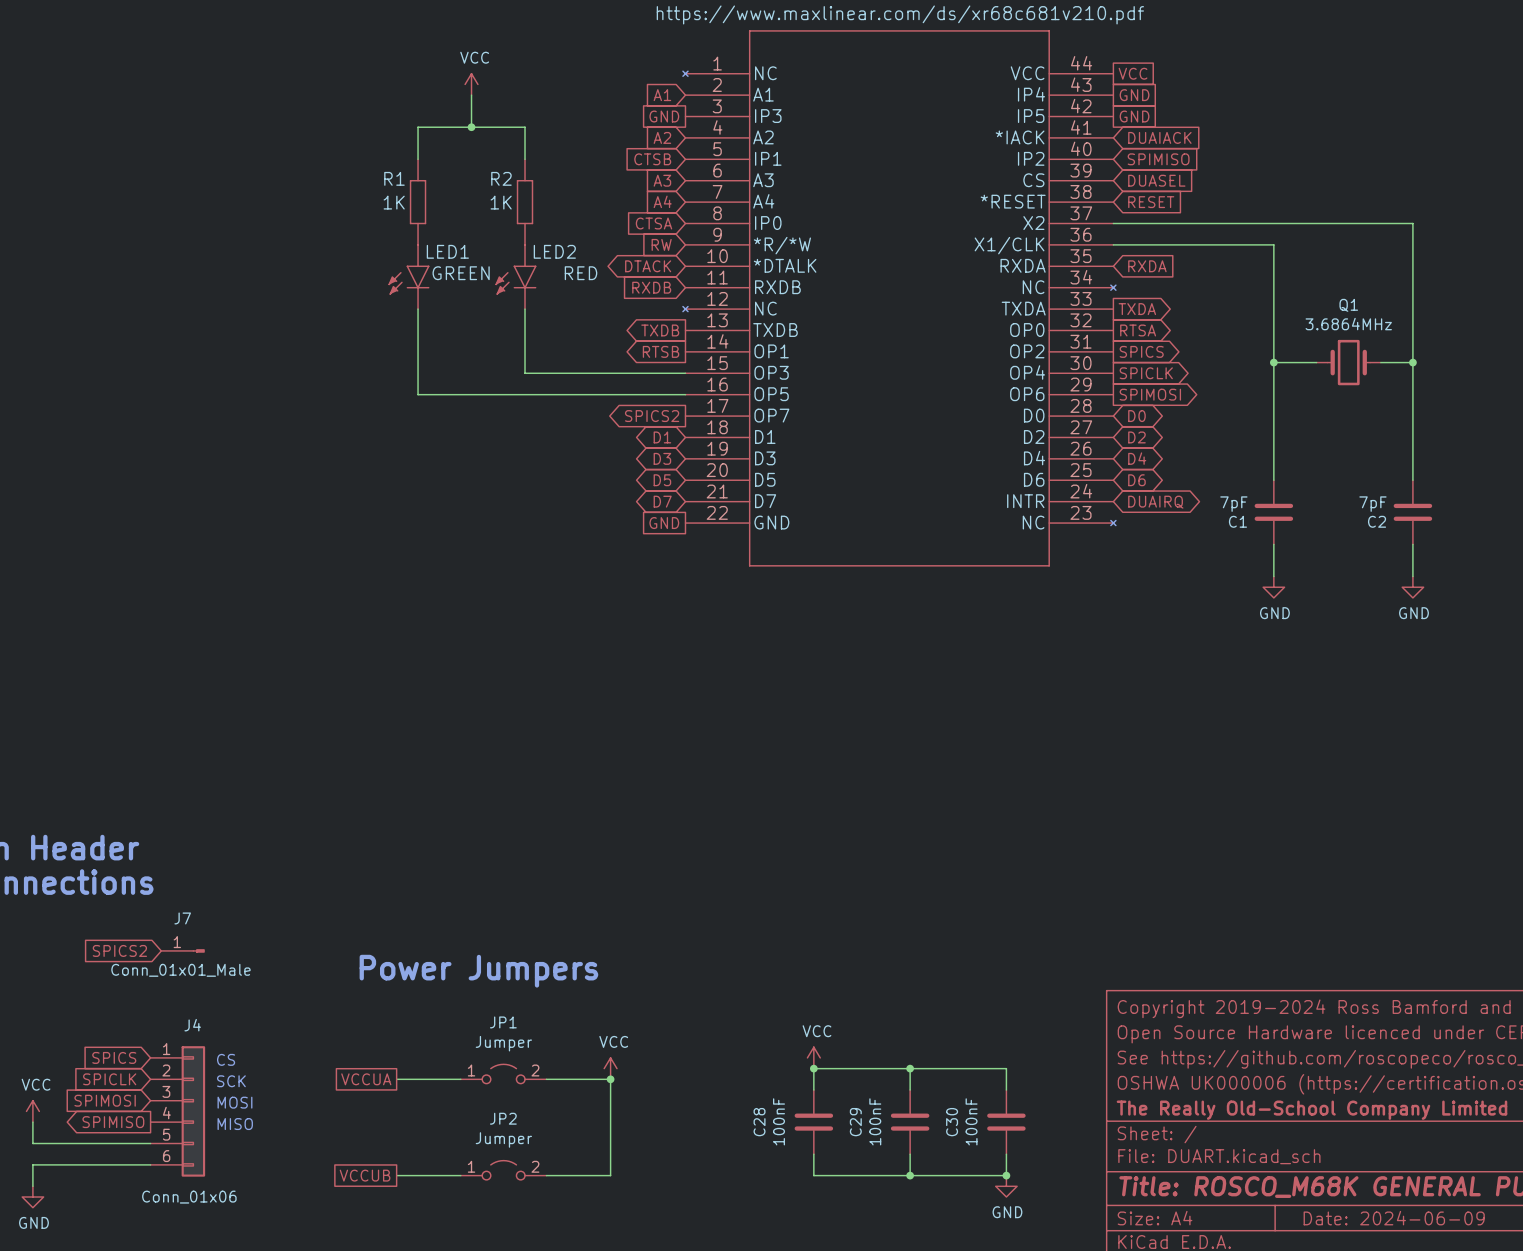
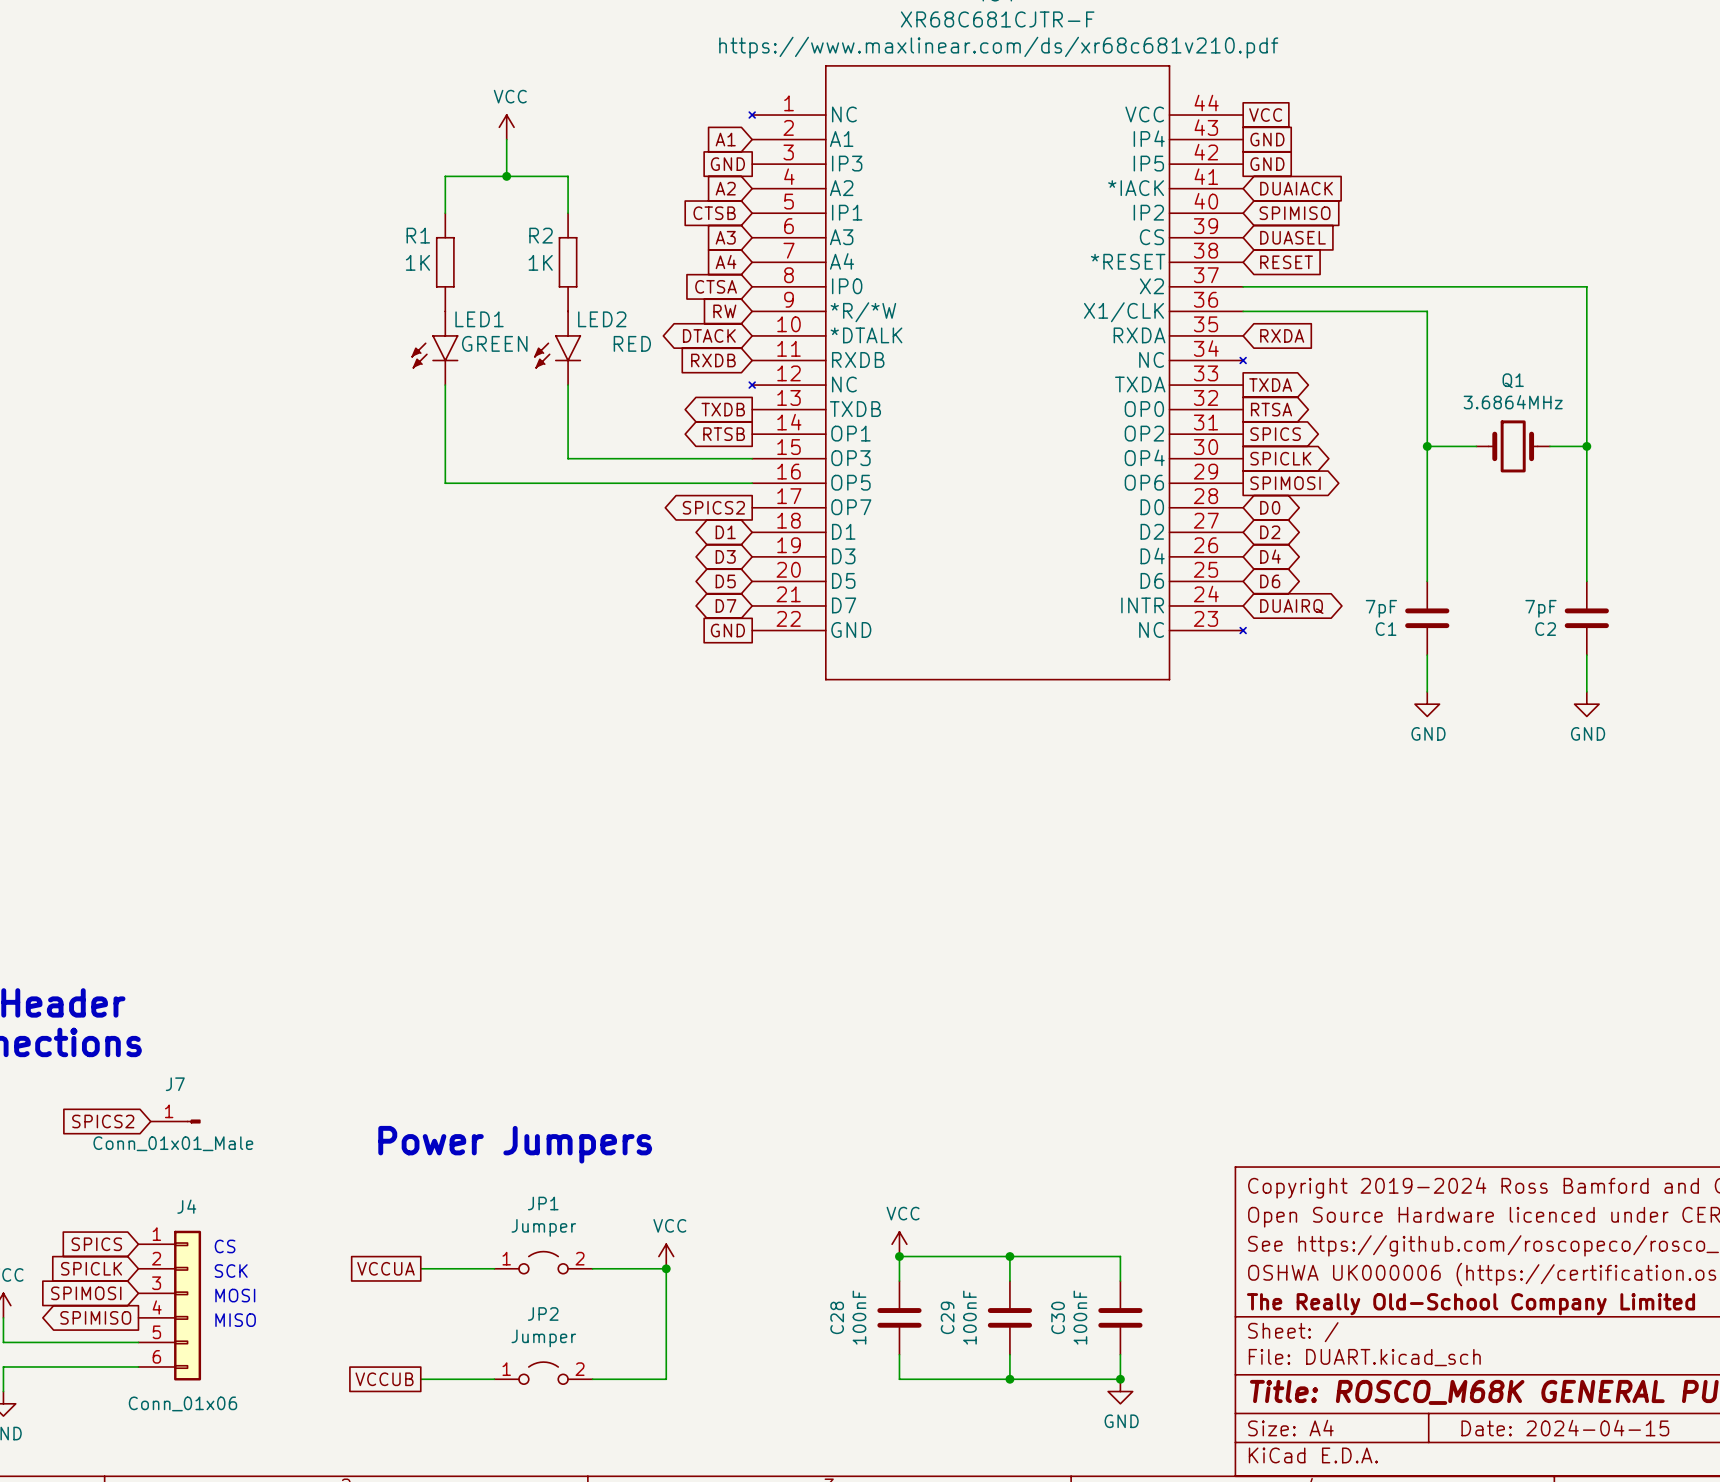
title block: Date: 2024-06-09 (1394, 1218) -> Date: 2024-04-15 (1565, 1428)

